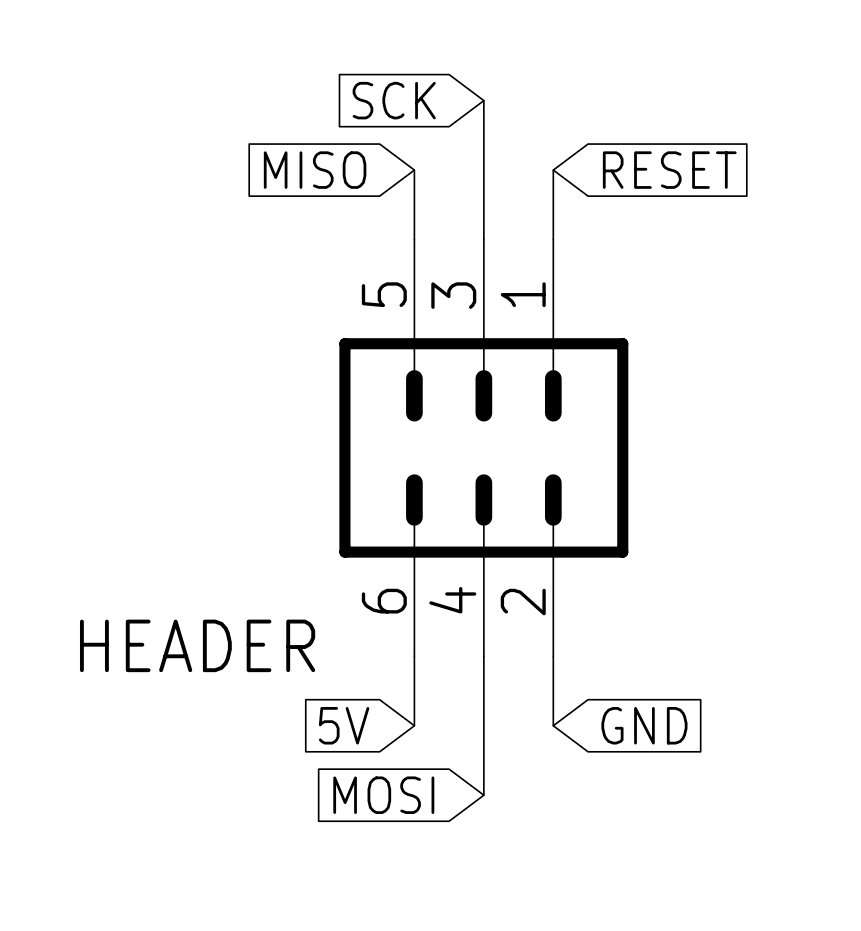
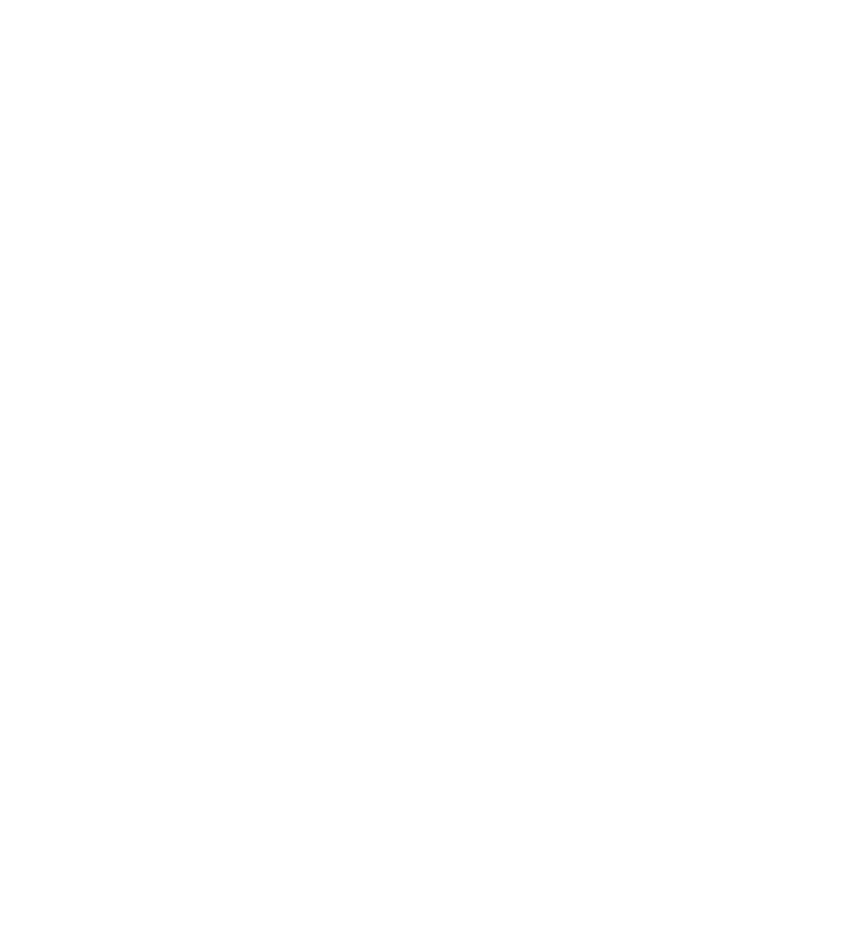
global label: SCK (394, 100) -> none
wire: (483, 100) (483, 239) -> none
global label: MISO (315, 170) -> none
wire: (414, 170) (414, 239) -> none
wire: (553, 170) (553, 239) -> none
global label: RESET (669, 170) -> none
HEADER: (483, 447) -> none
wire: (414, 656) (414, 725) -> none
wire: (483, 656) (483, 795) -> none
wire: (553, 656) (553, 725) -> none
global label: 5V (344, 725) -> none
global label: GND (644, 725) -> none
global label: MOSI (383, 795) -> none

